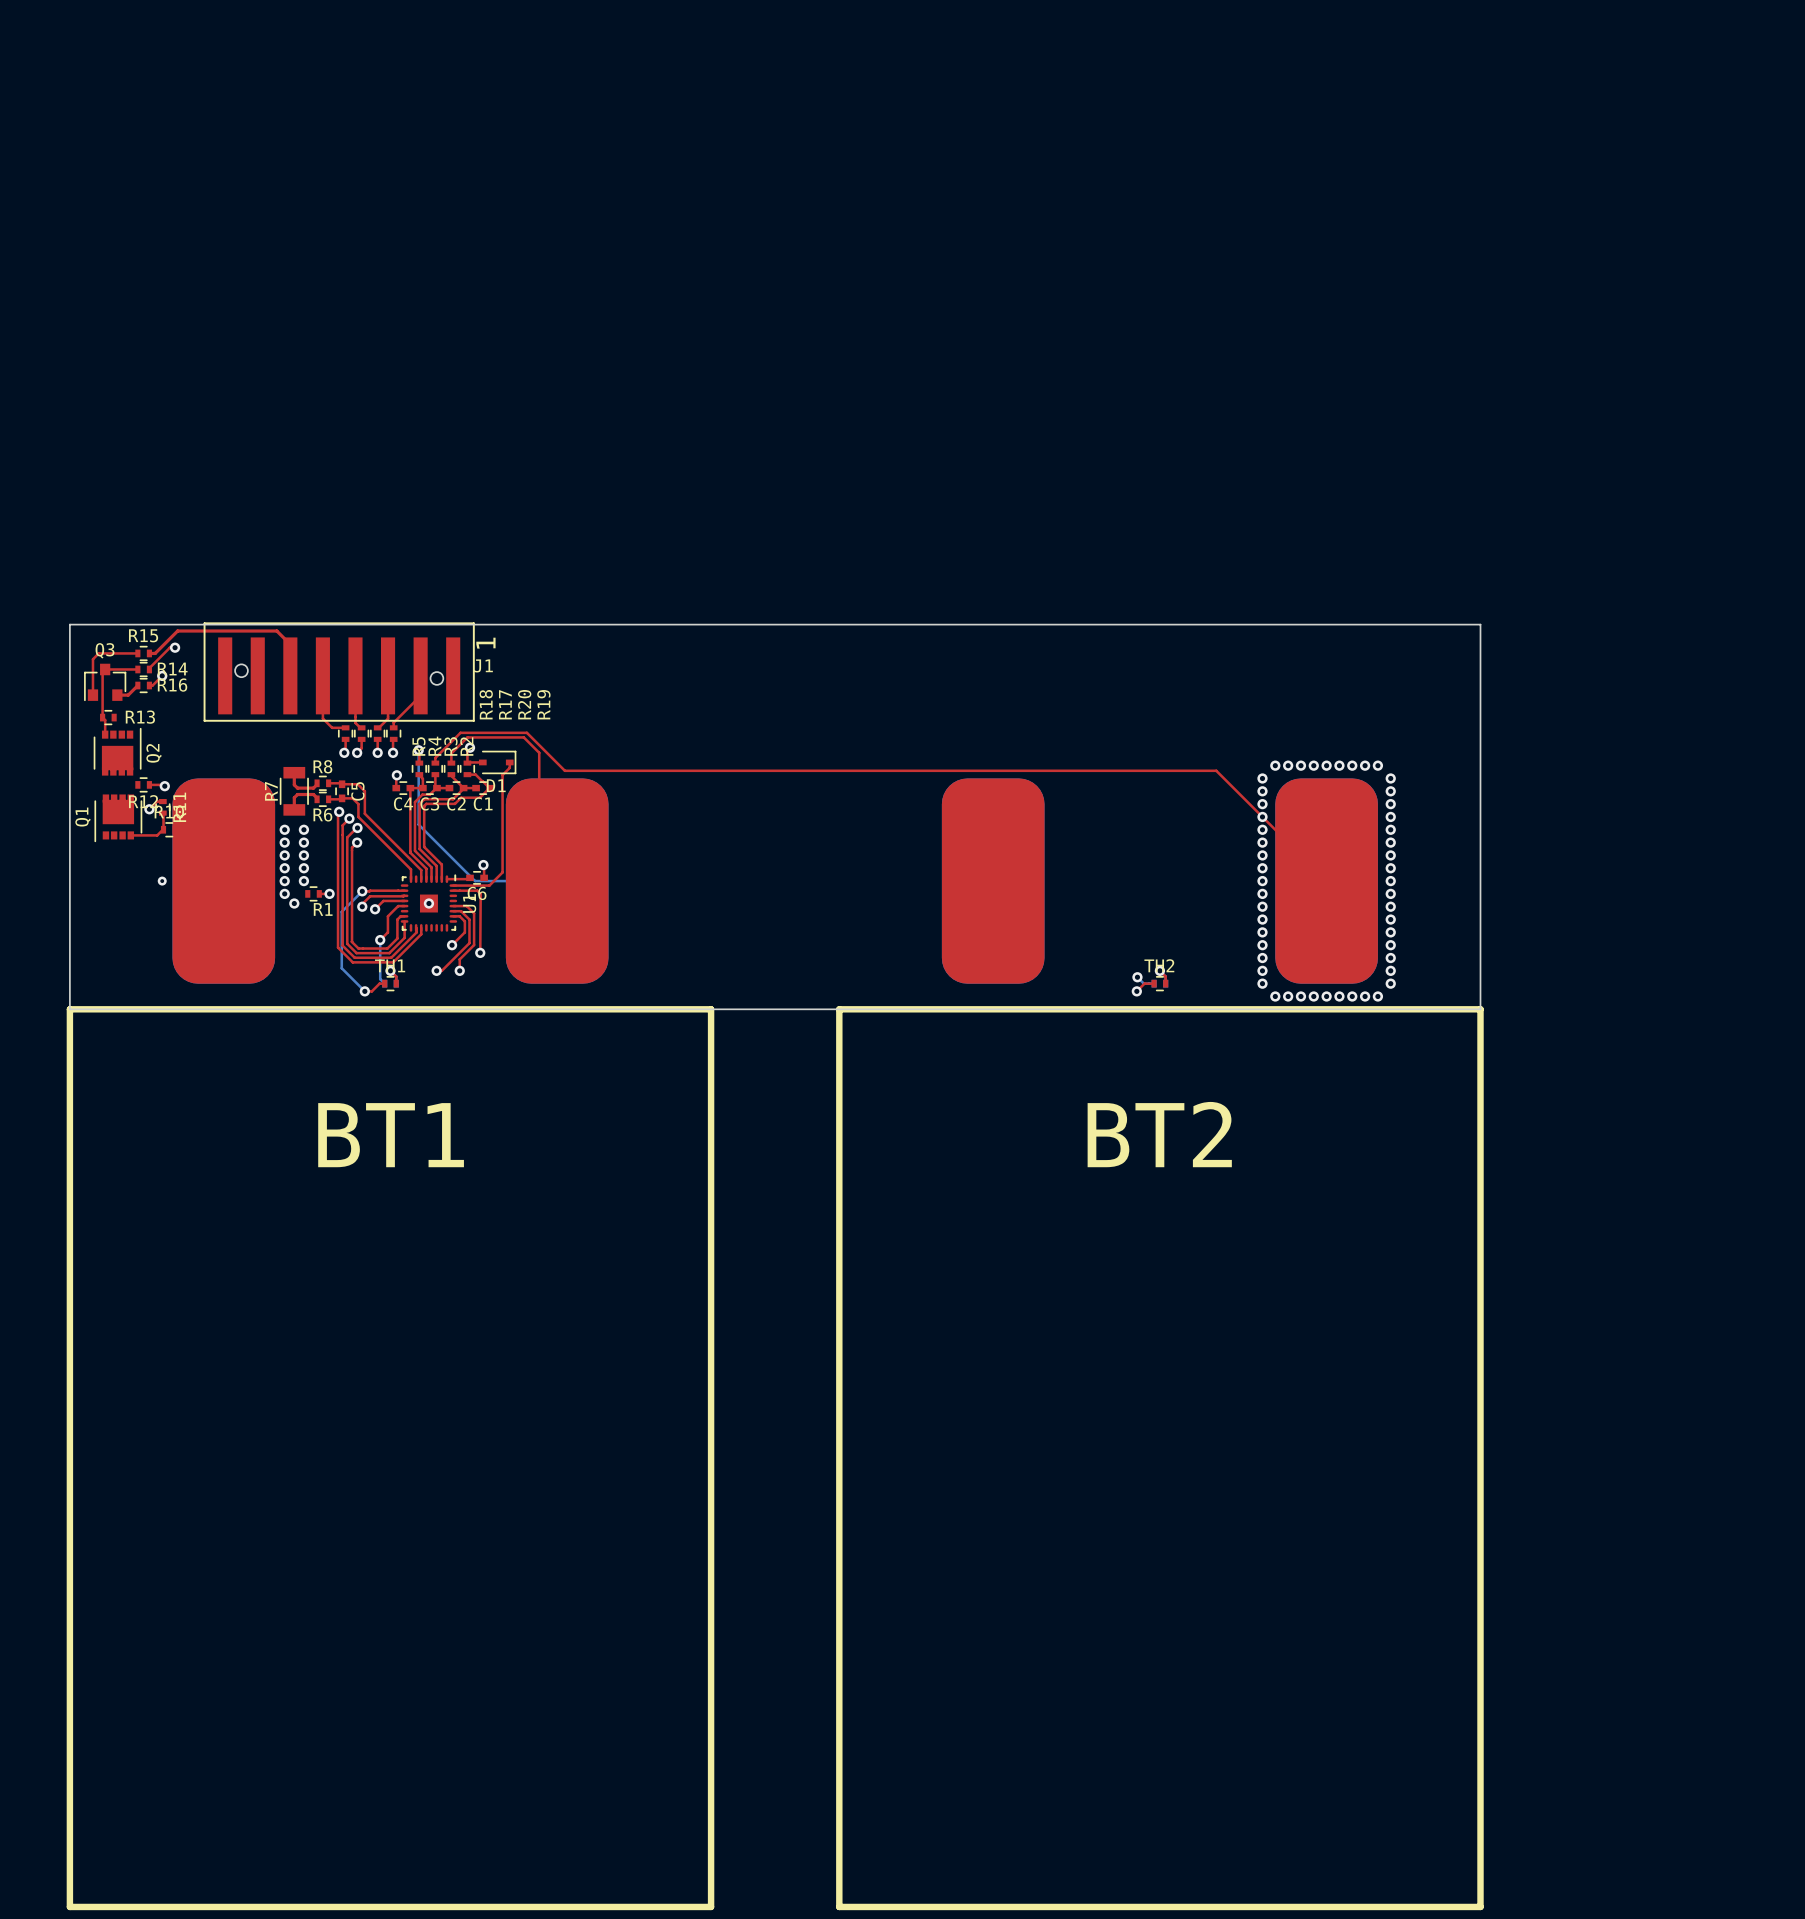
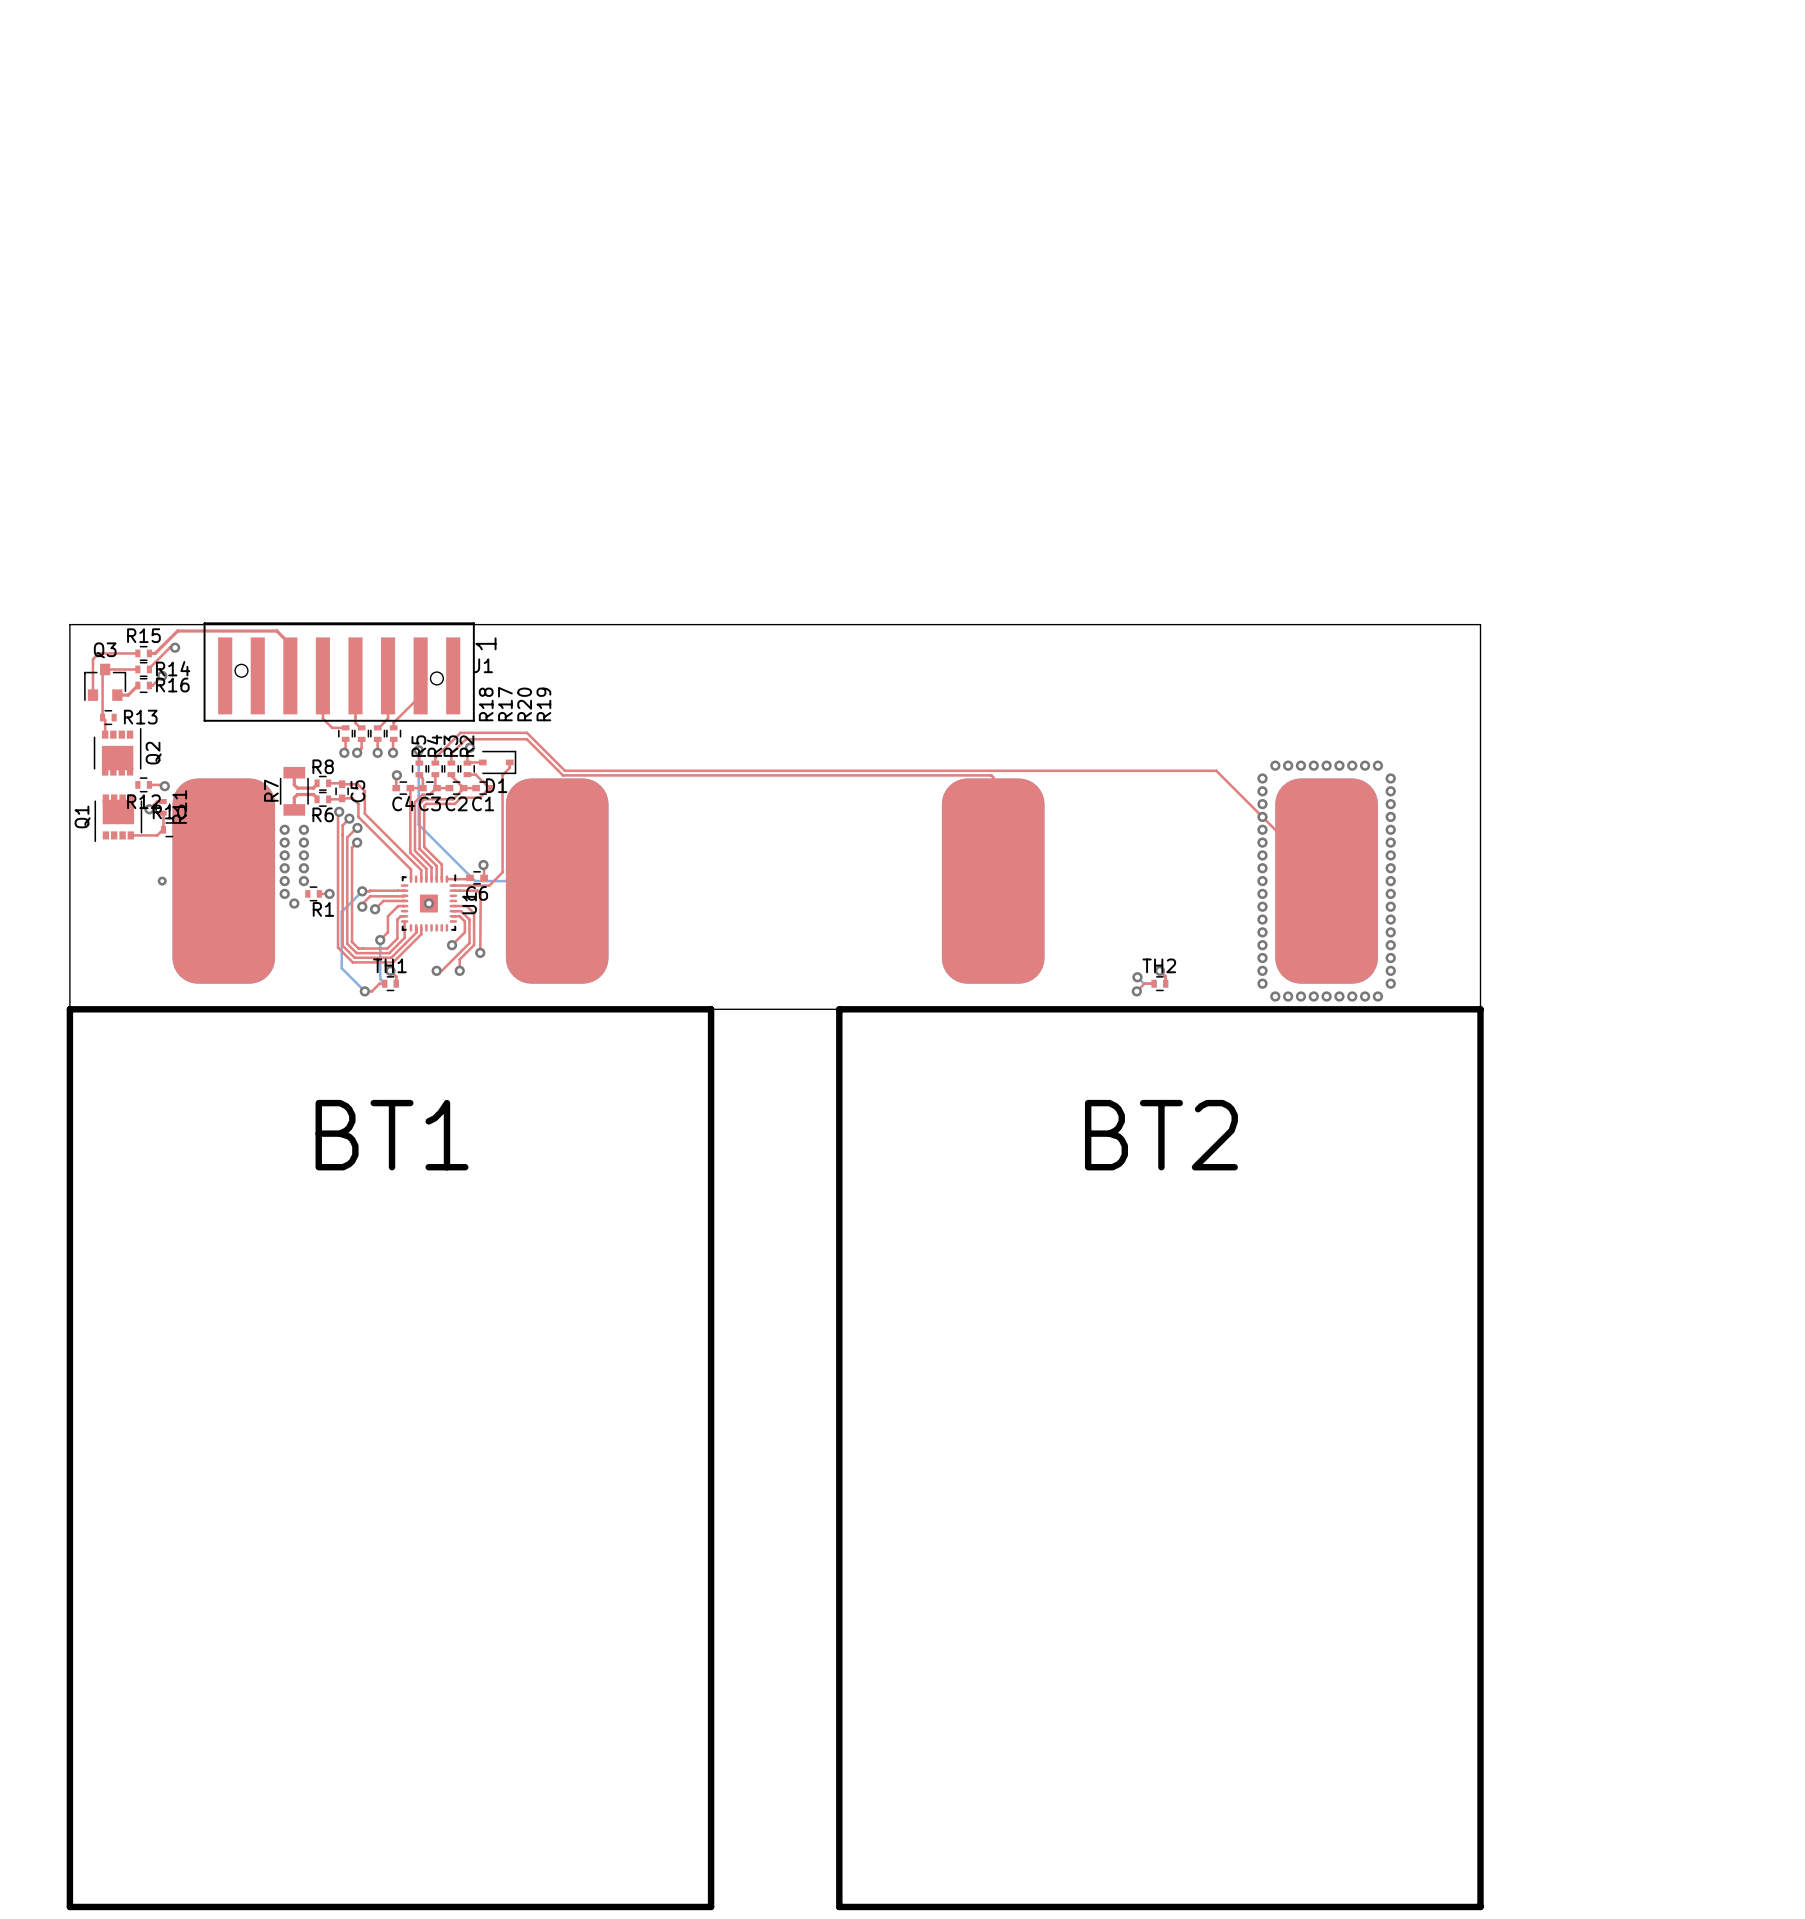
top track: (451, 753) (467, 737) (523, 737) (539, 752) (539, 811) (557, 829) (557, 881) -> (451, 753) (465, 739) (526, 739) (562, 775) (991, 775) (993, 777) (993, 881)

